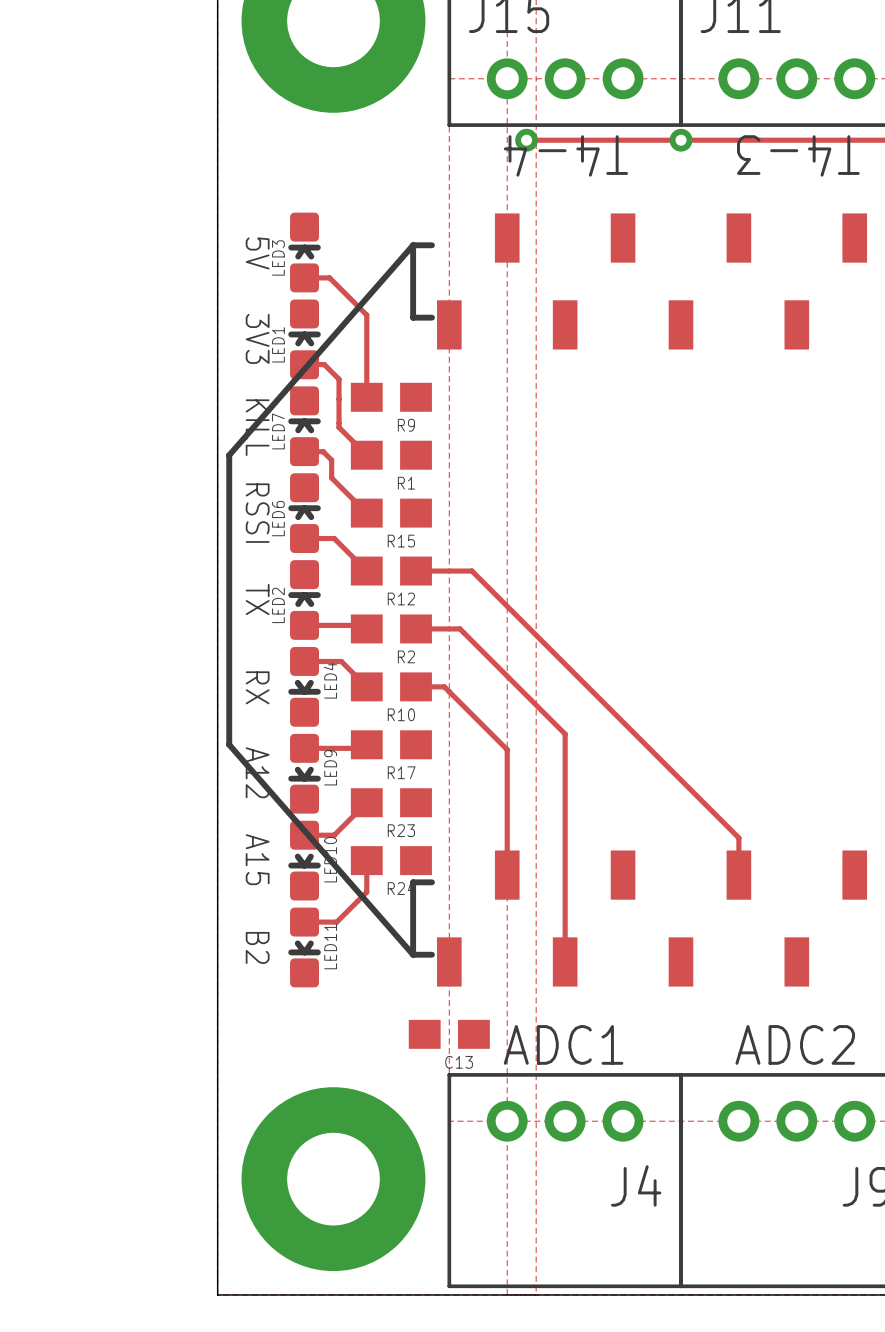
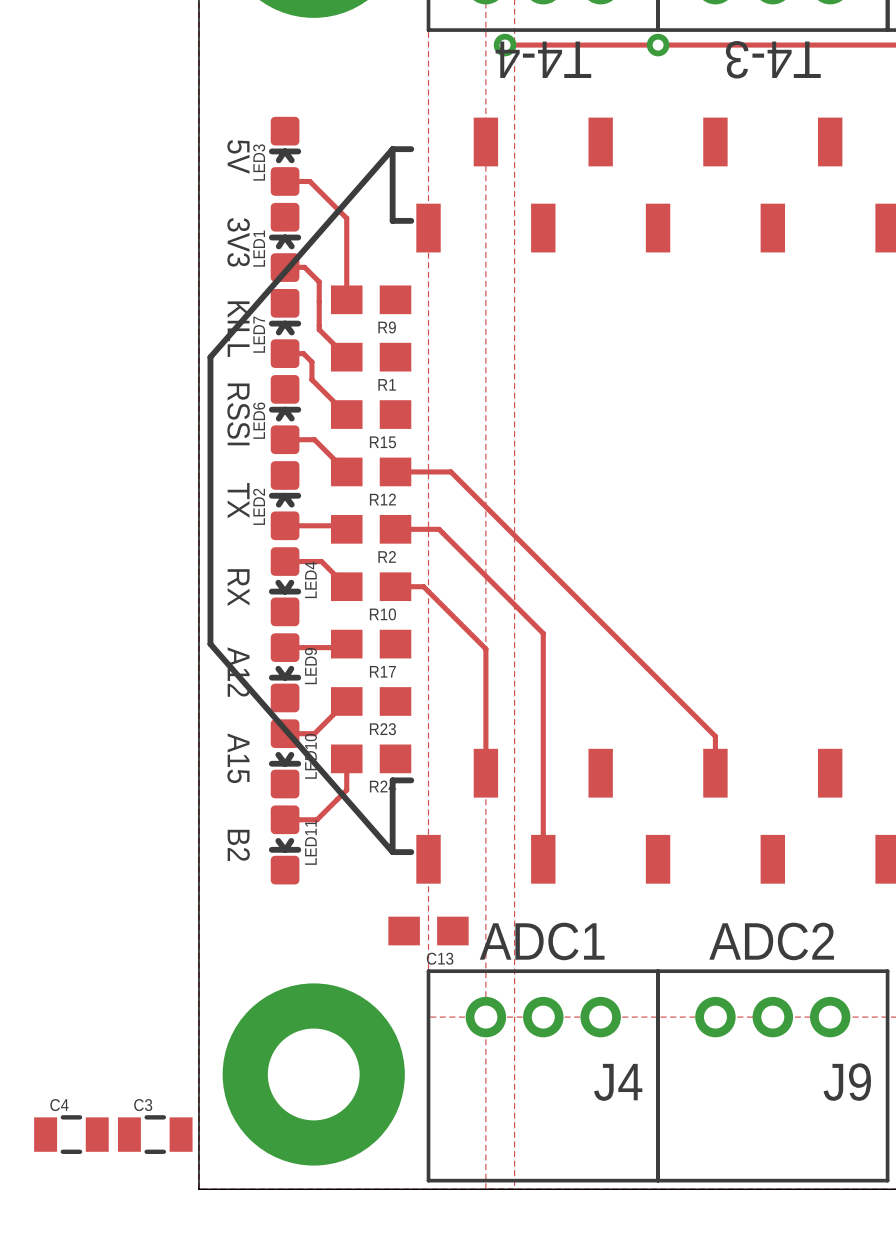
C4: none -> (71, 1134)
C3: none -> (155, 1134)

